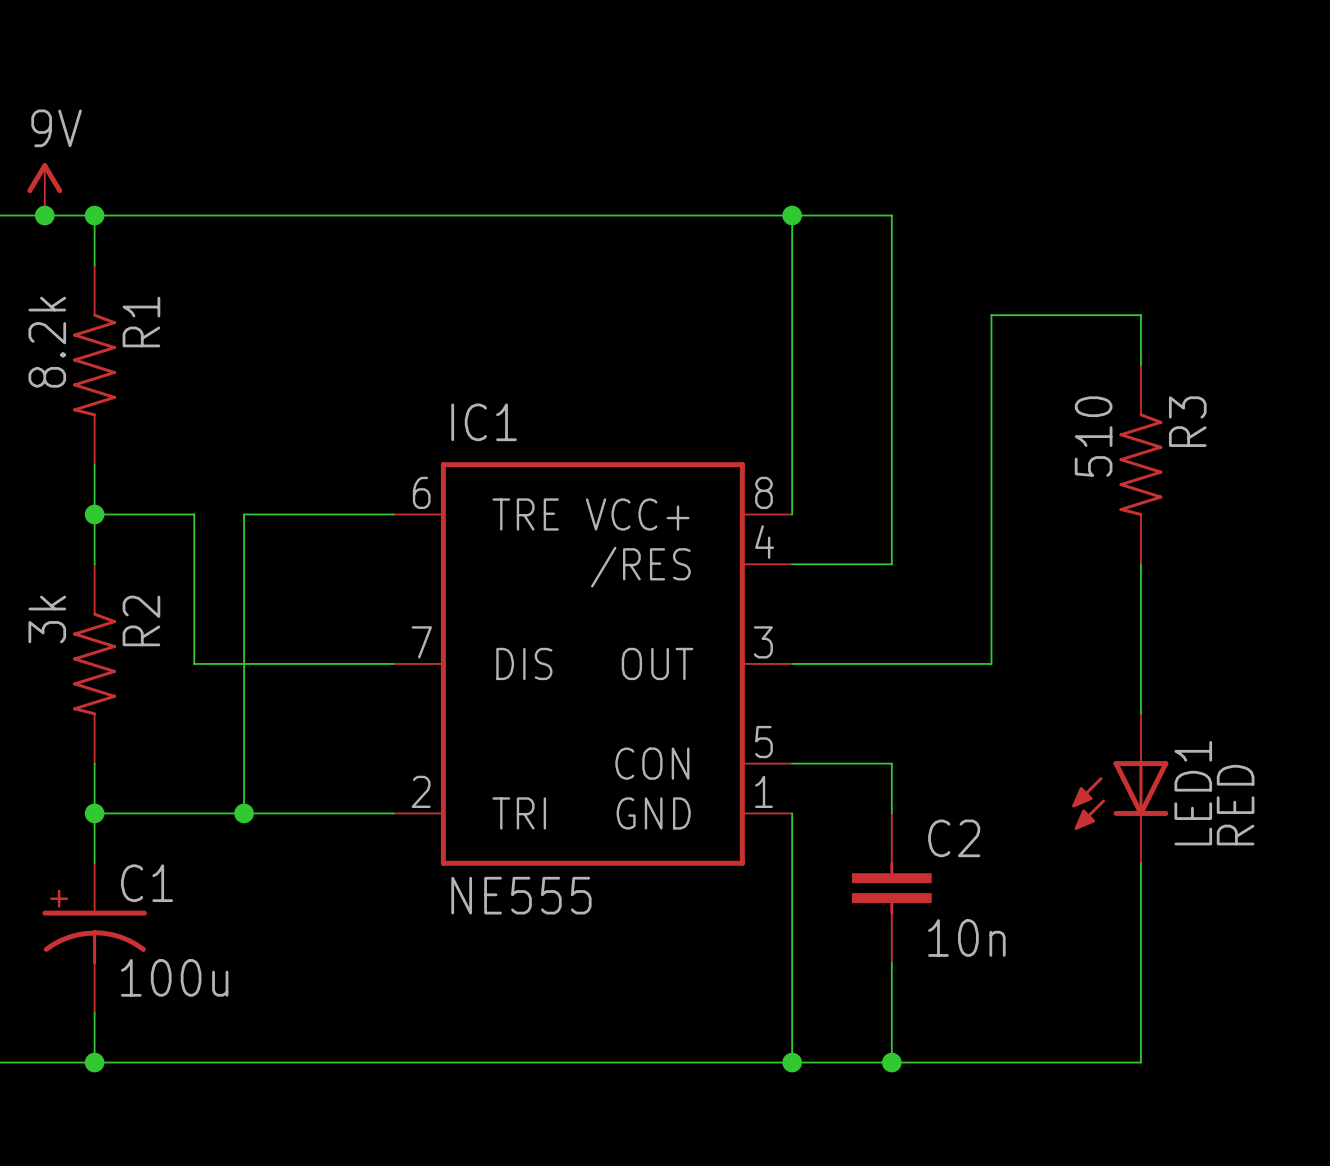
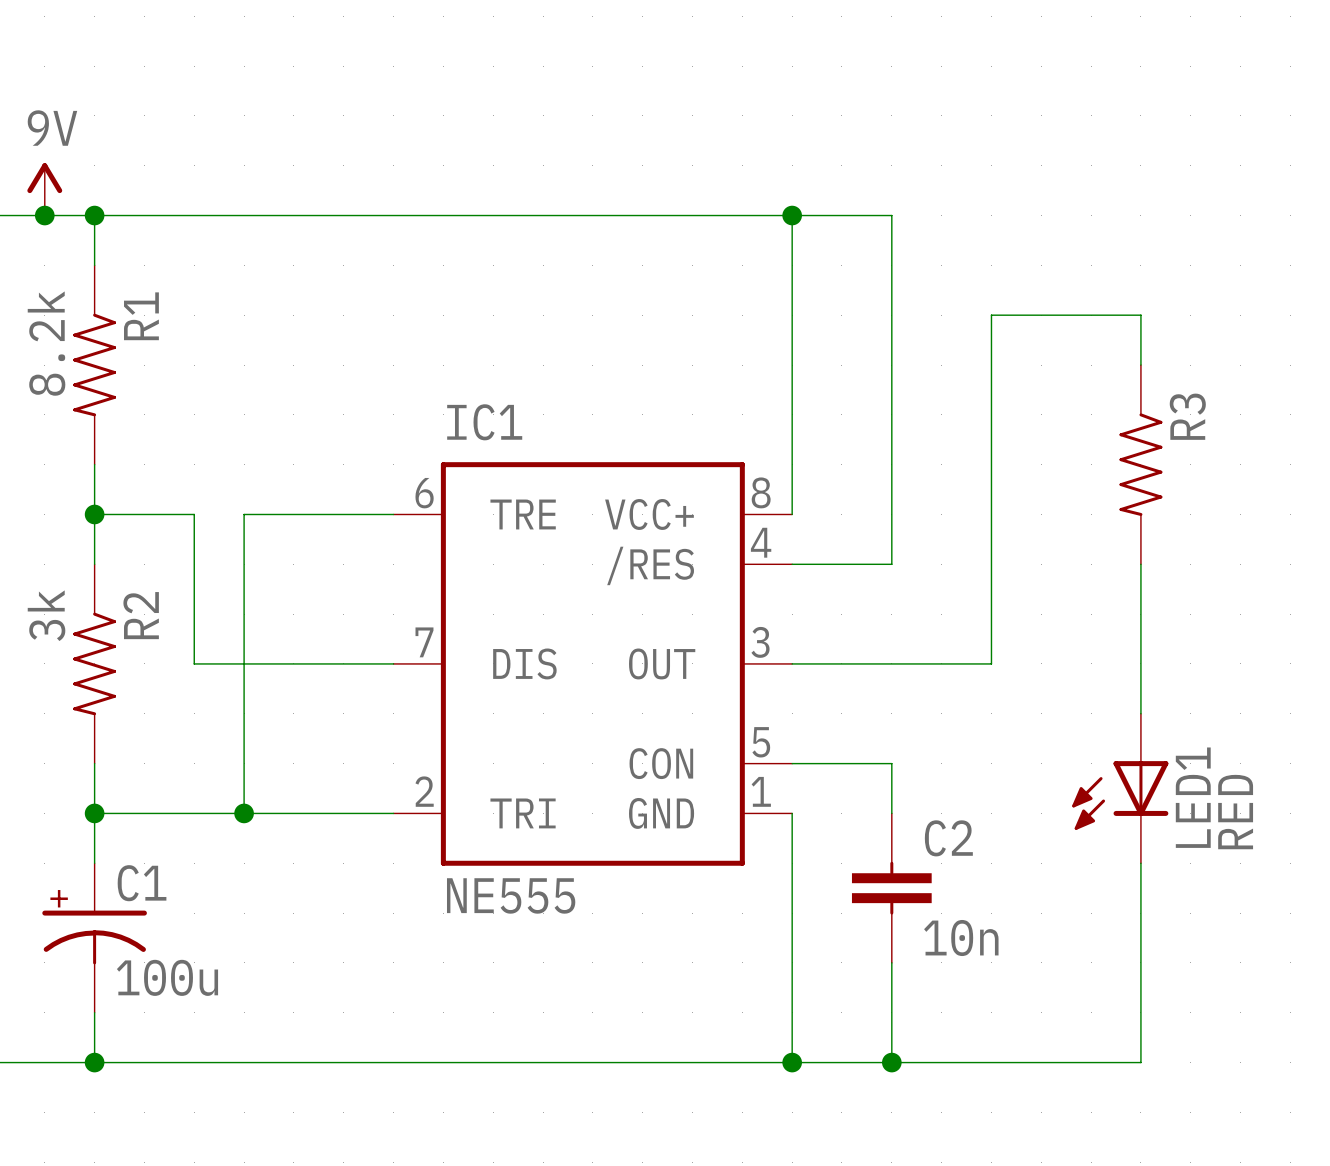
R3 value: 510 (1093, 436) -> none

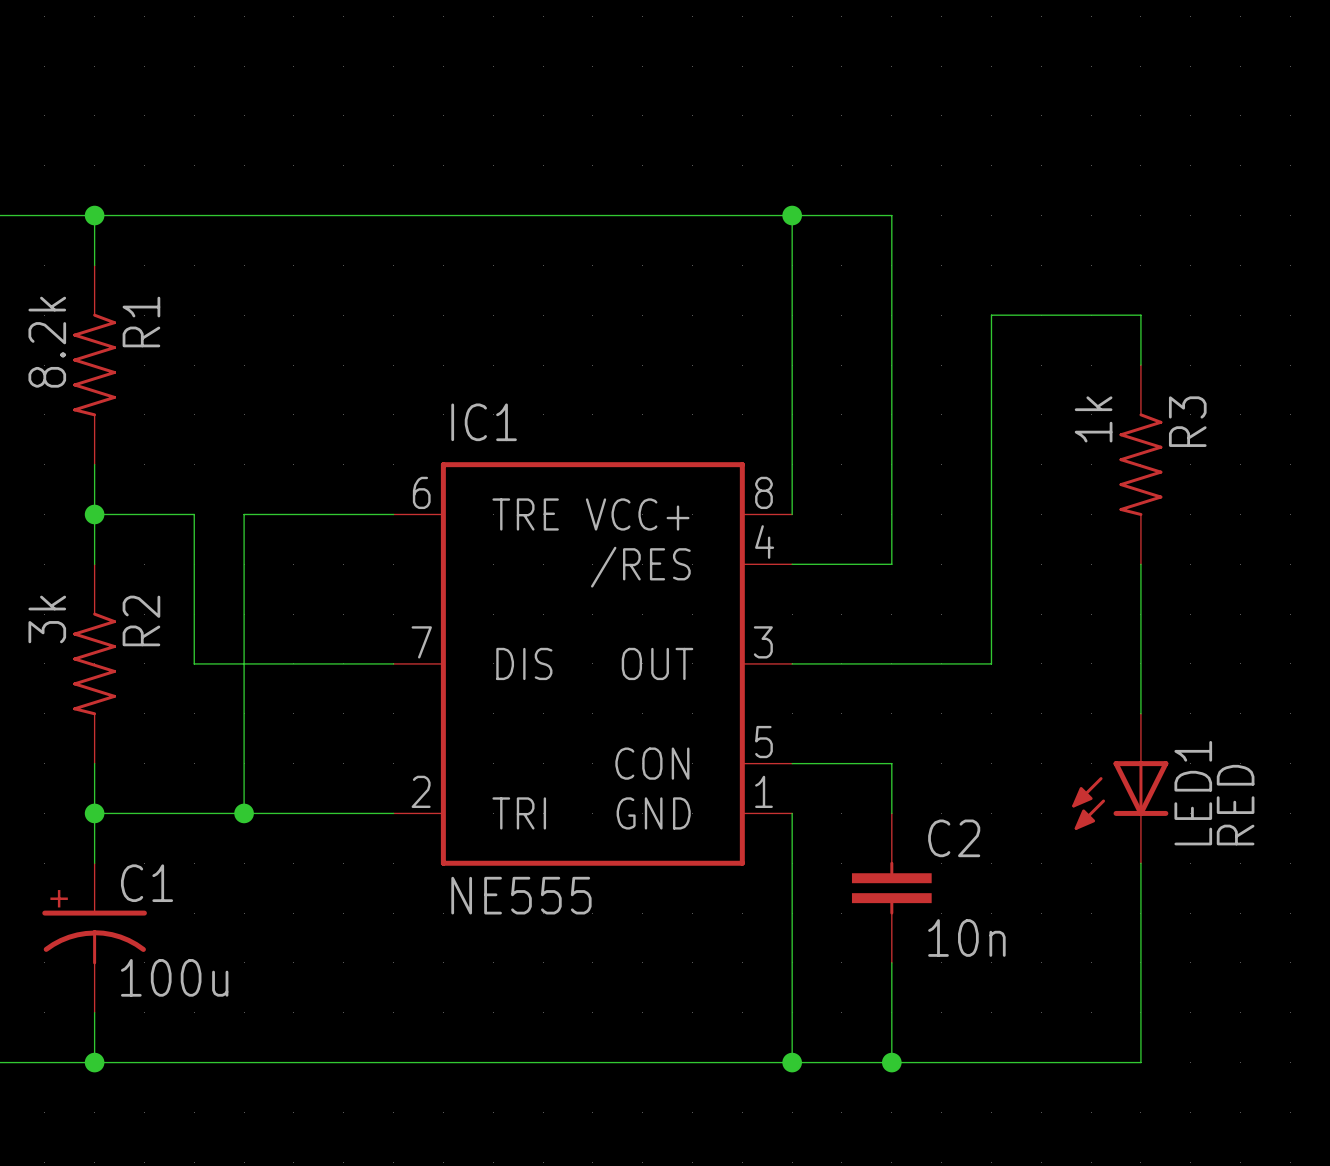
power symbol: 9V (44, 189) -> none
junction: (44, 215) -> none
R3 value: none -> 1k (1093, 419)

